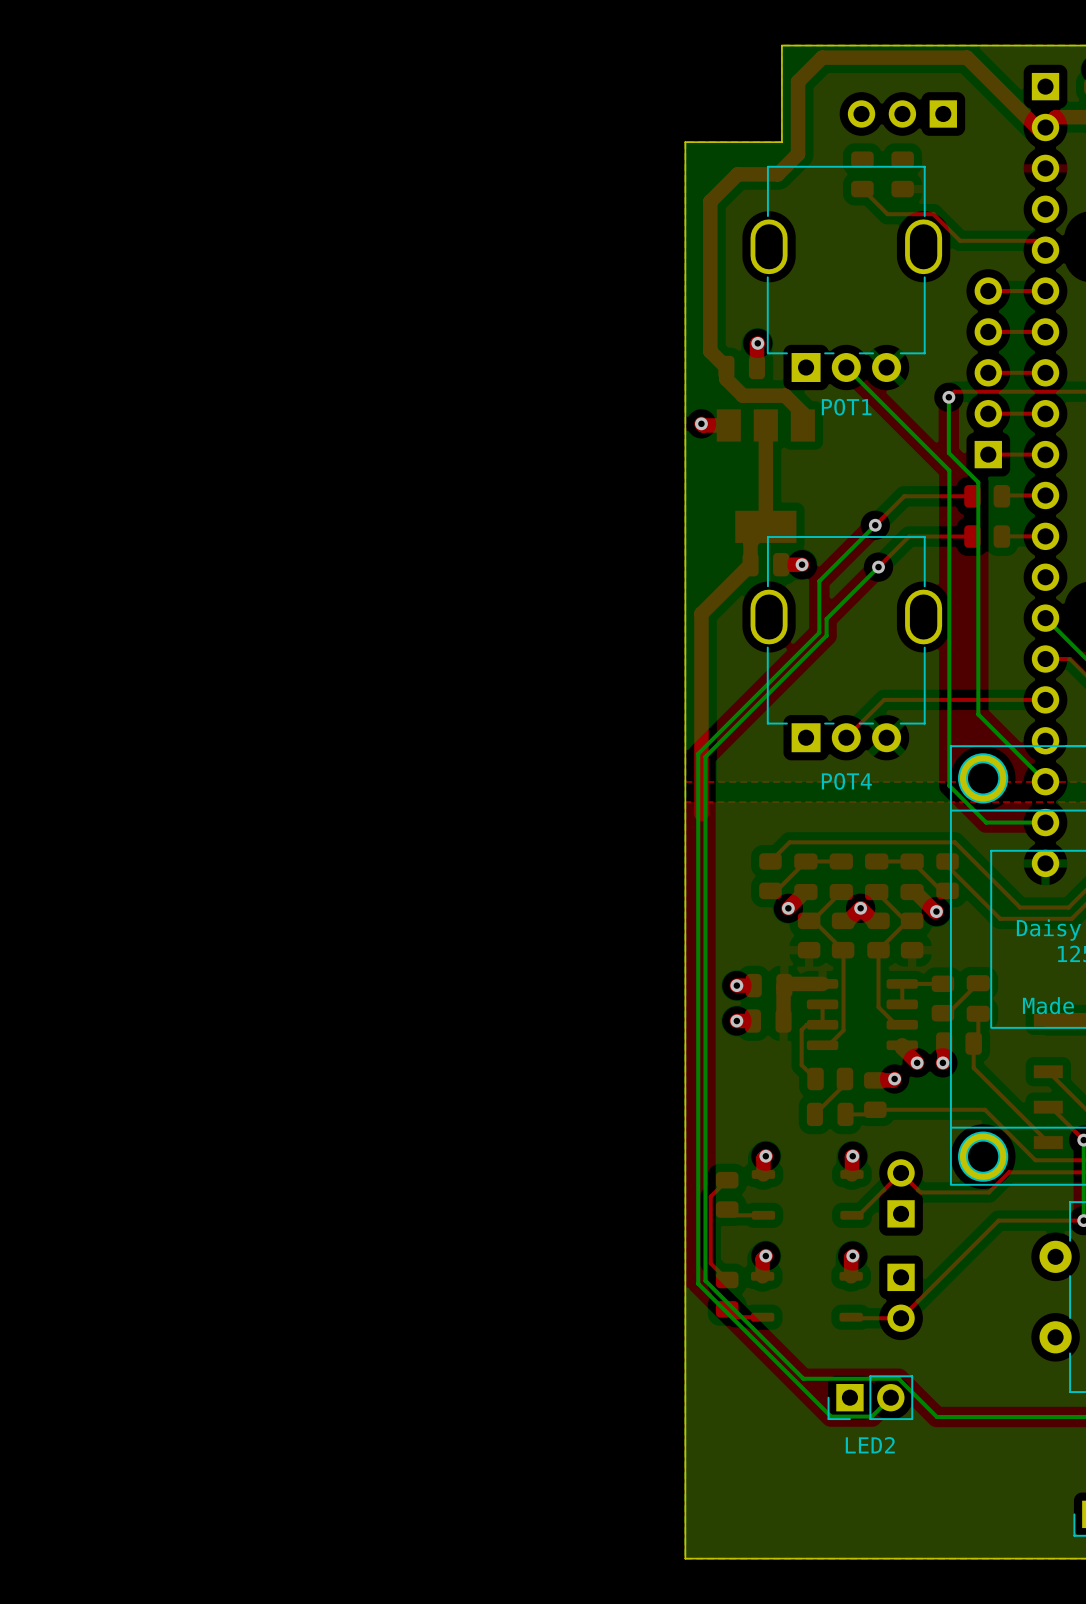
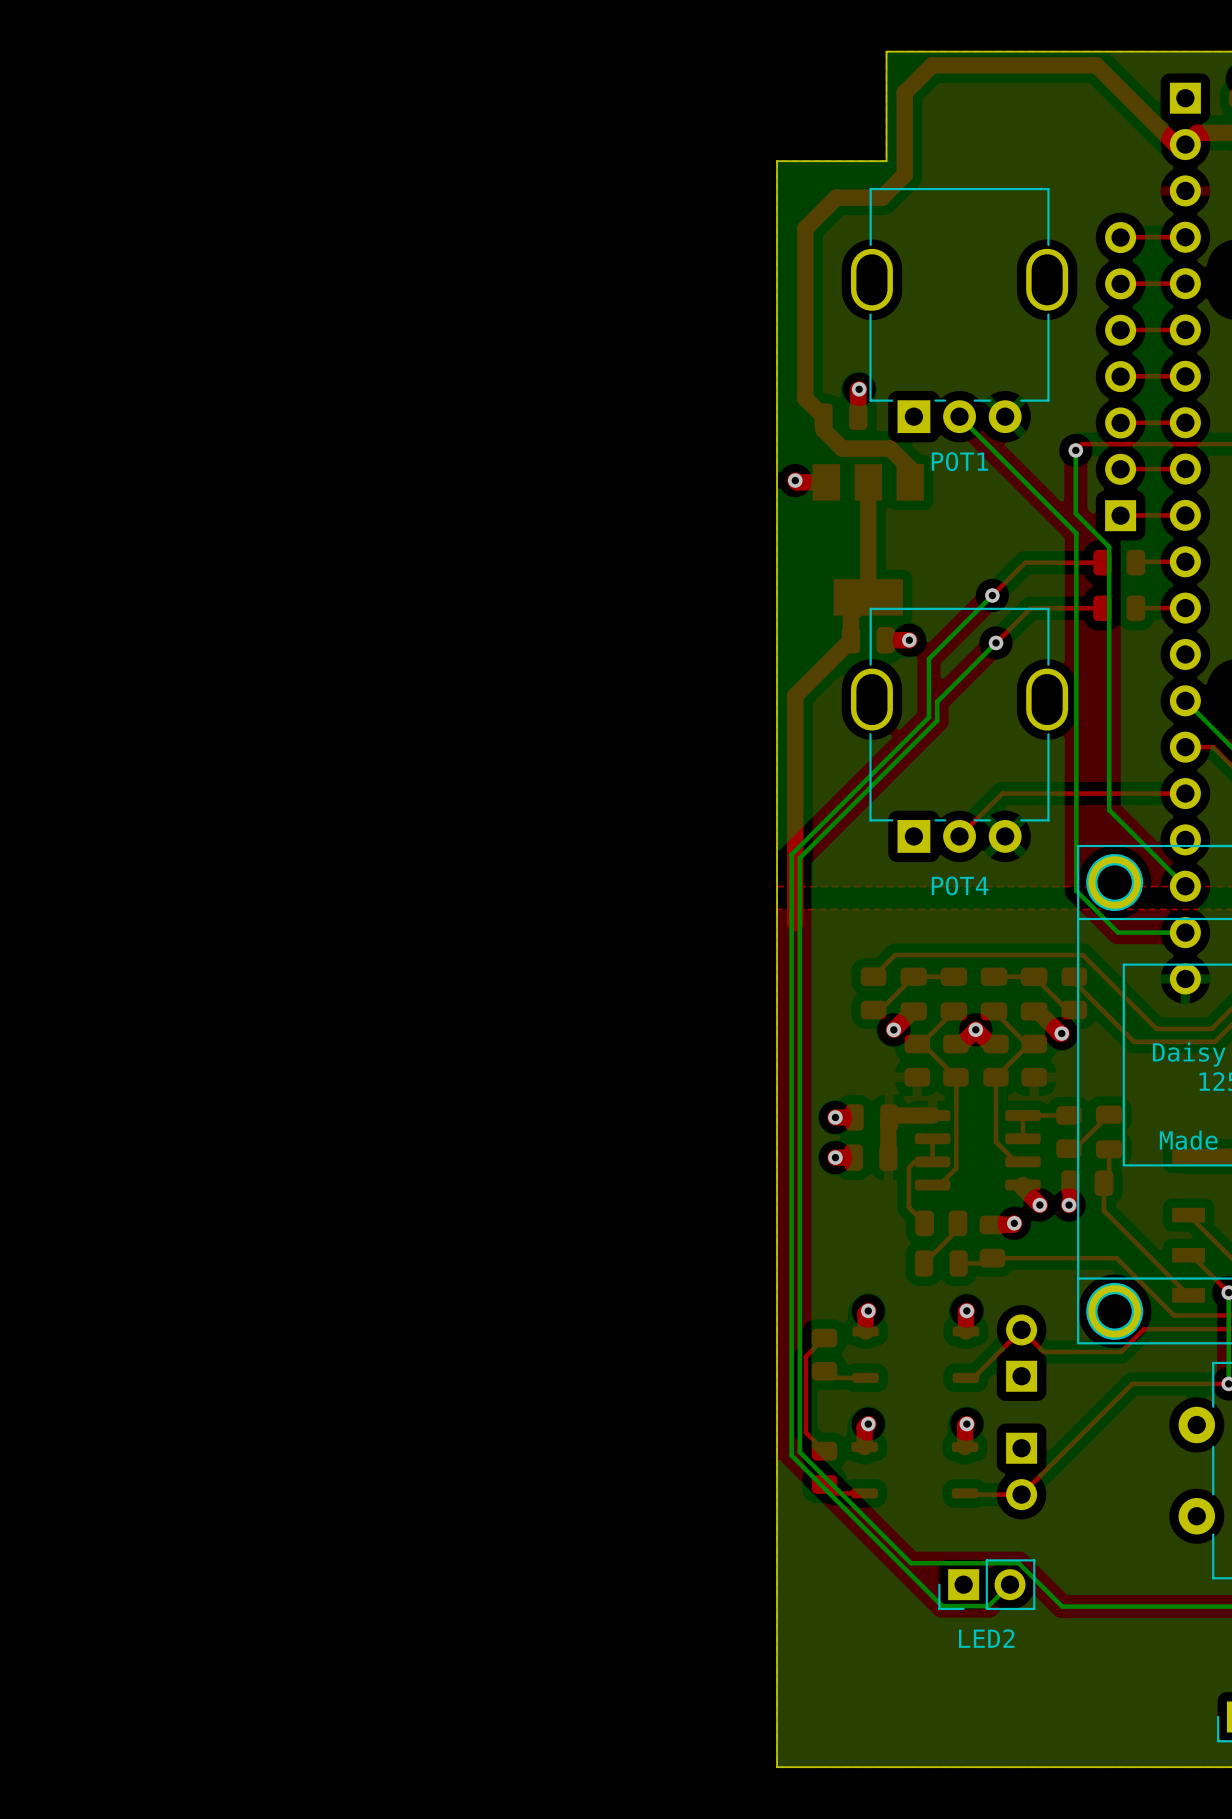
part: (902, 113) -> none
part: (862, 174) -> none
part: (902, 174) -> none
top track: (862, 189) (887, 214) (933, 214) (960, 240) (1036, 240) (1045, 250) -> (1120, 283) (1185, 283)
top track: none -> (1185, 237) (1120, 237)
part: none -> (1120, 376)
part: (988, 372) -> none

